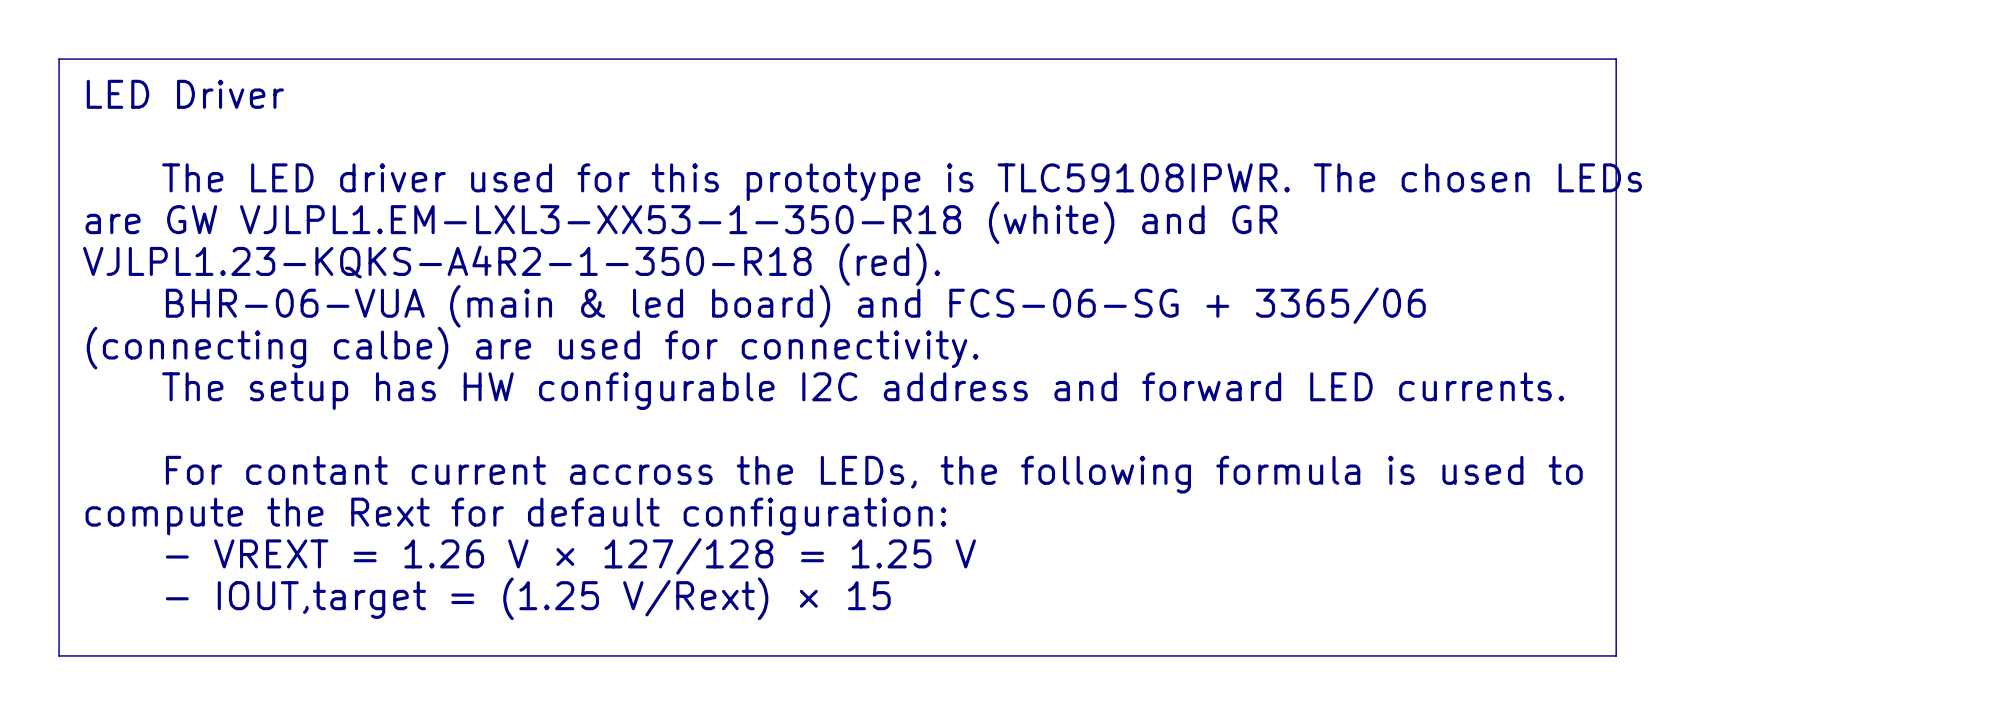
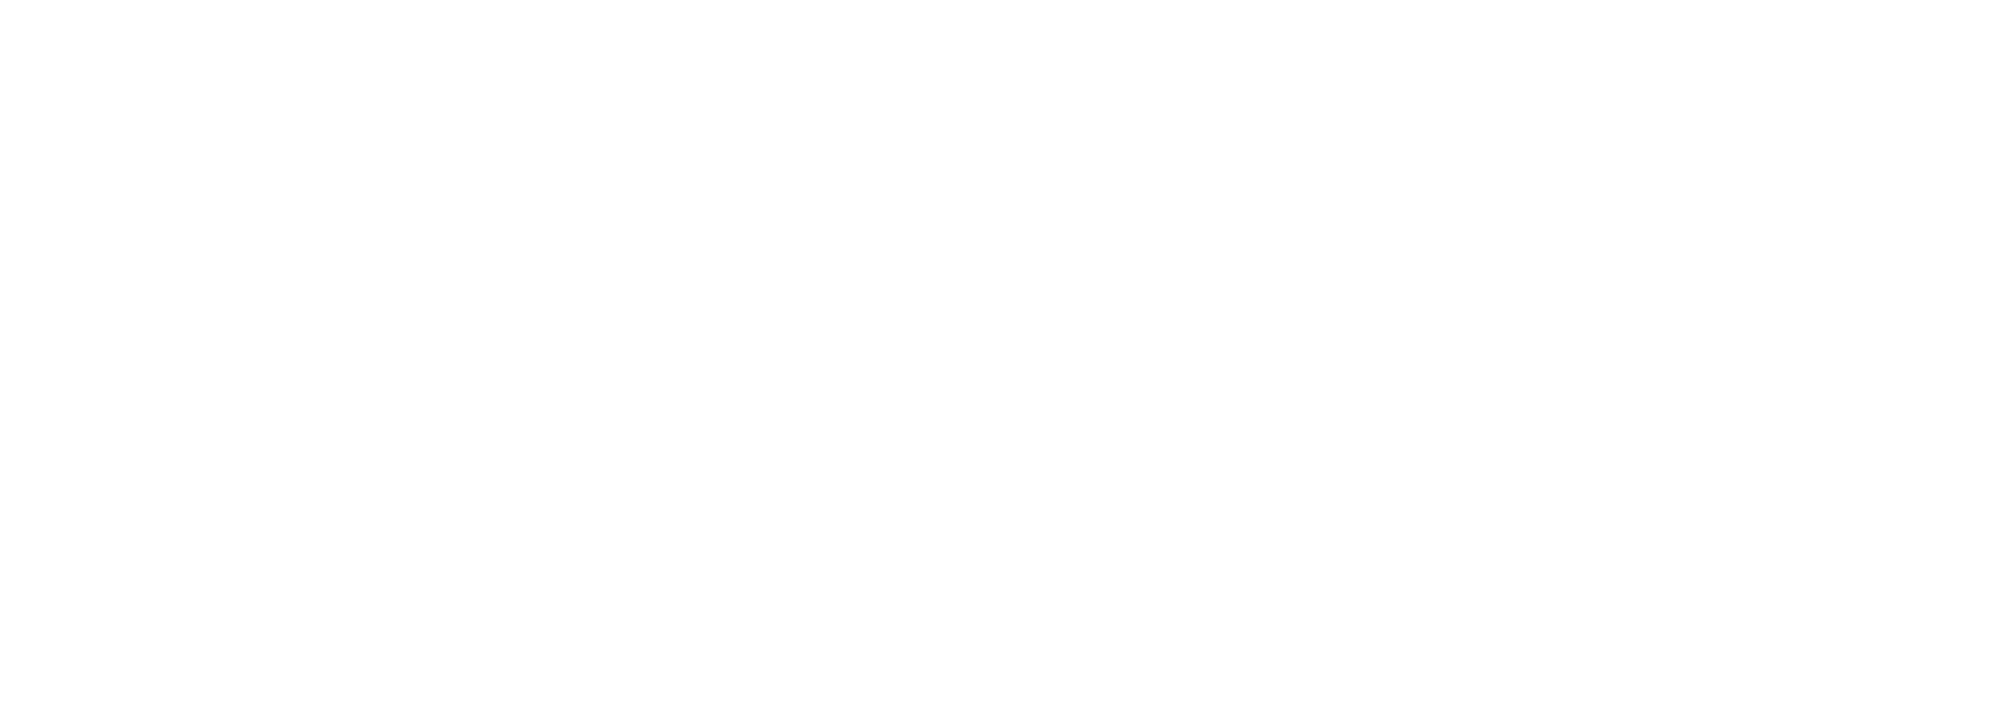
line: (59, 59) (1616, 59) (1616, 655) (59, 655) (59, 59) -> none
text: LED Driver (185, 94) -> none
text: The LED driver used for this prototype is TLC59108IPWR. The chosen LEDs (902, 182) -> none
text: are GW VJLPL1.EM-LXL3-XX53-1-350-R18 (white) and GR (681, 222) -> none
text: VJLPL1.23-KQKS-A4R2-1-350-R18 (red). (511, 264) -> none
text: BHR-06-VUA (main & led board) and FCS-06-SG + 3365/06 (795, 306) -> none
text: (connecting calbe) are used for connectivity. (532, 348) -> none
text: The setup has HW configurable I2C address and forward LED currents. (863, 391) -> none
text: For contant current accross the LEDs, the following formula is used to (874, 474) -> none
text: compute the Rext for default configuration: (515, 516) -> none
text: - VREXT = 1.26 V × 127/128 = 1.25 V (570, 556) -> none
text: - IOUT,target = (1.25 V/Rext) × 15 (528, 598) -> none

